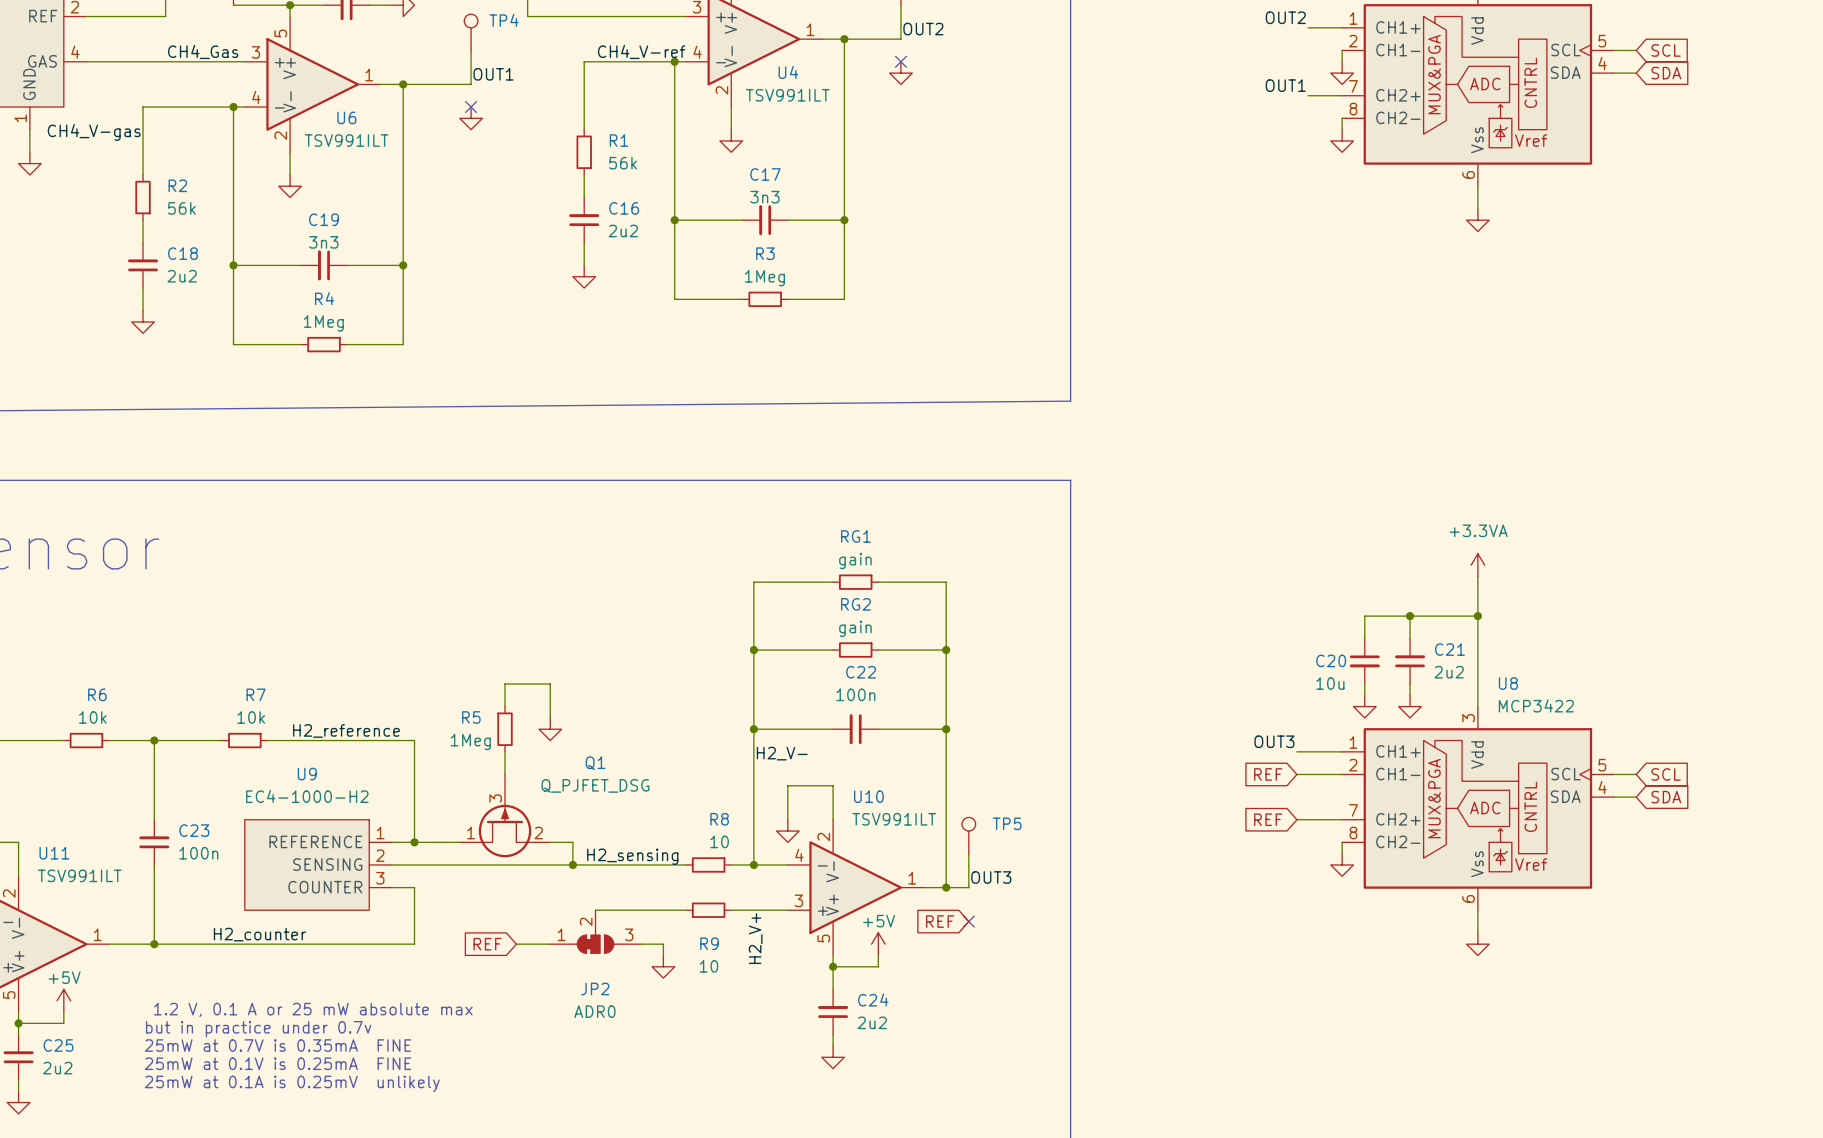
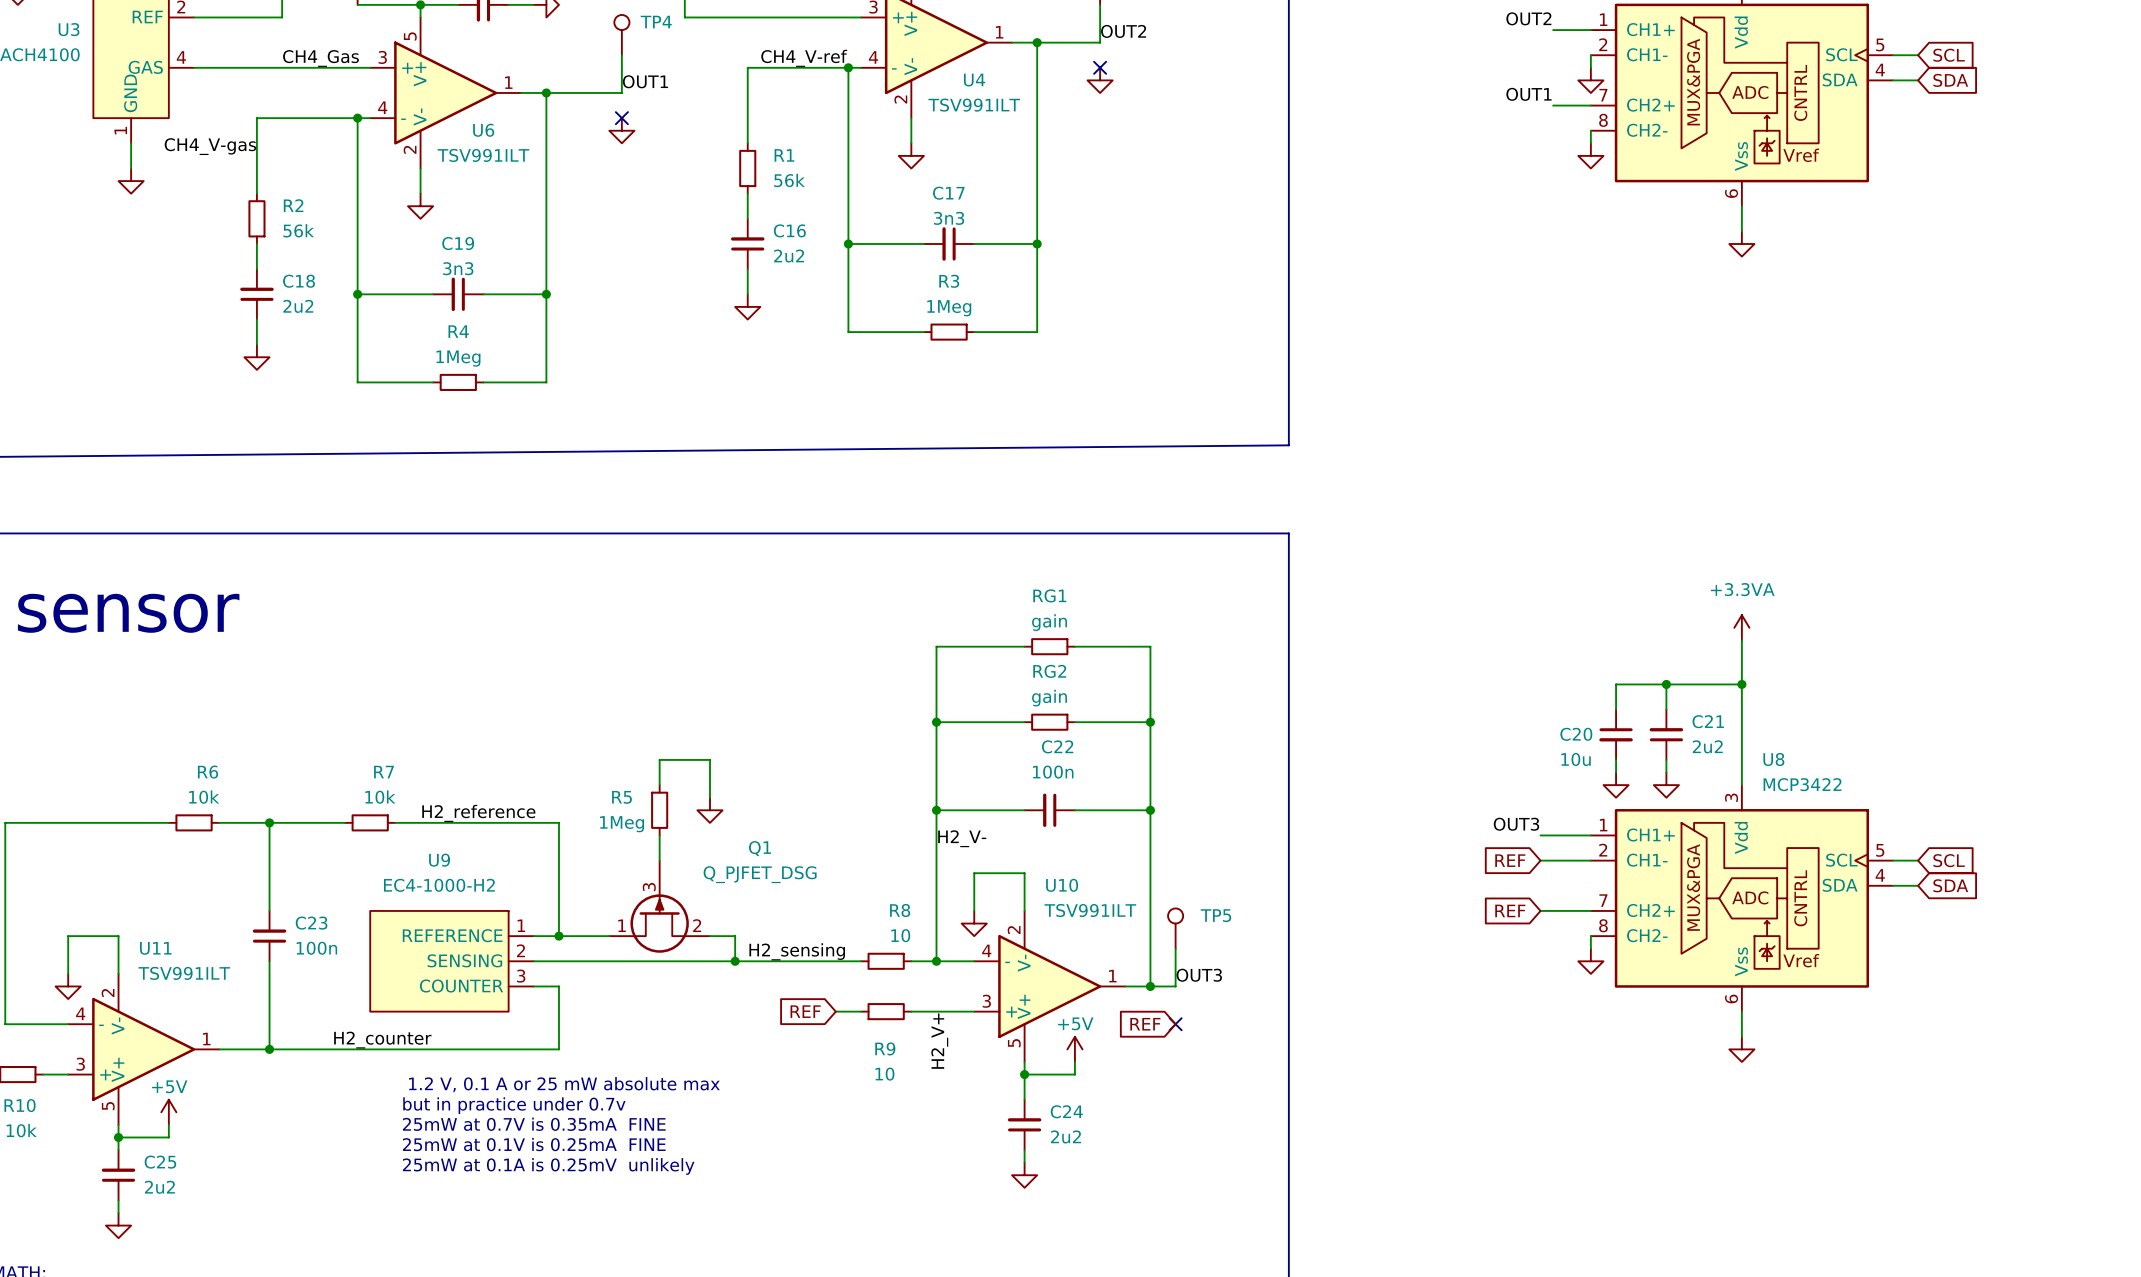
wire: (595, 910) (663, 910) -> none
JP2: ADR0 (595, 931) -> none
global label position: REF (487, 944) -> REF (805, 1011)
wire: (516, 944) (550, 944) -> none
wire: (640, 944) (663, 944) (663, 955) -> none
power symbol: (663, 966) -> none
text position: 1.2 V, 0.1 A or 25 mW absolute max (313, 1009) -> 1.2 V, 0.1 A or 25 mW absolute max (564, 1084)
text position: but in practice under 0.7v (258, 1029) -> but in practice under 0.7v (514, 1105)
text position: 25mW at 0.7V is 0.35mA FINE (278, 1045) -> 25mW at 0.7V is 0.35mA FINE (534, 1124)
text position: 25mW at 0.1V is 0.25mA FINE (278, 1063) -> 25mW at 0.1V is 0.25mA FINE (534, 1144)
text position: 25mW at 0.1A is 0.25mV unlikely (292, 1083) -> 25mW at 0.1A is 0.25mV unlikely (548, 1166)

